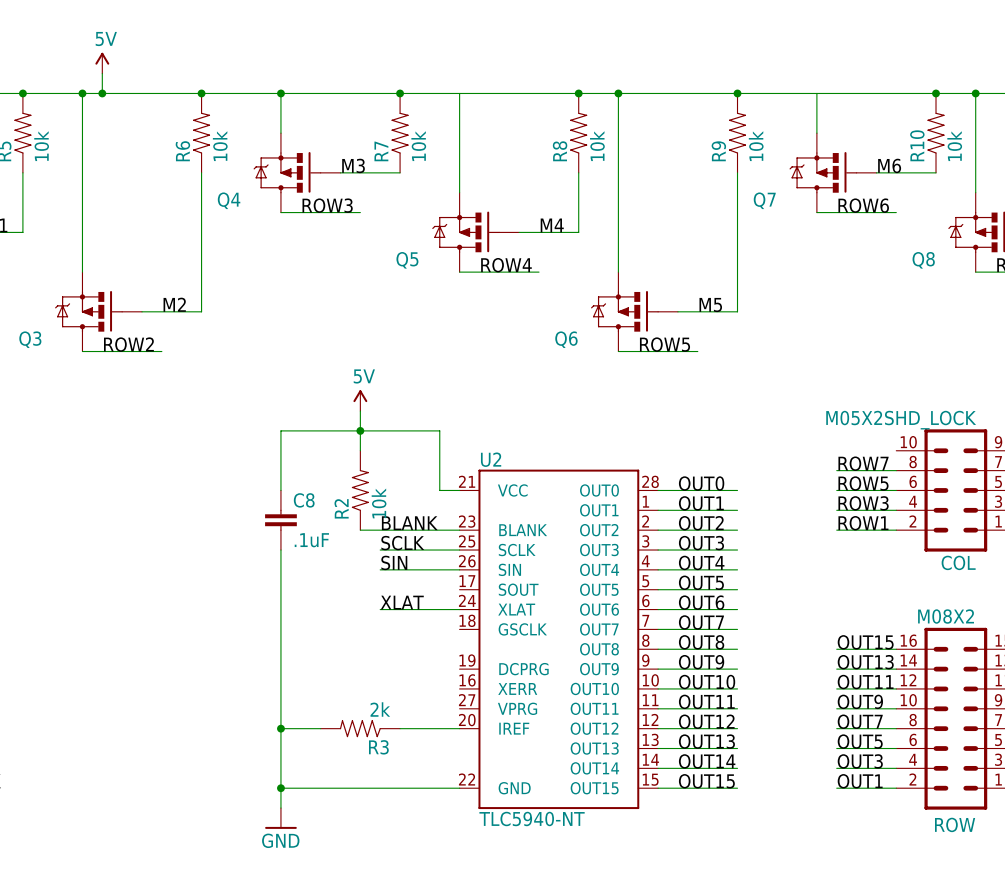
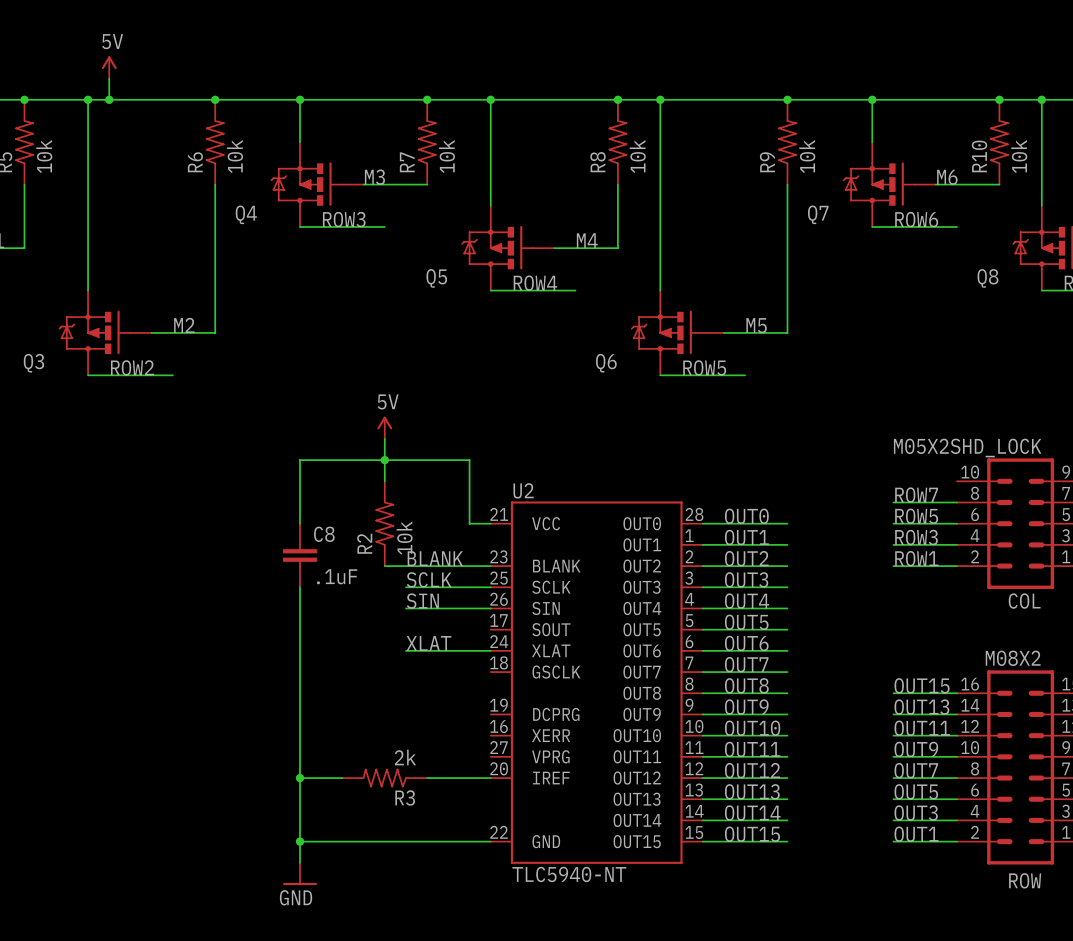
junction: none -> (490, 99)
junction: none -> (872, 99)

